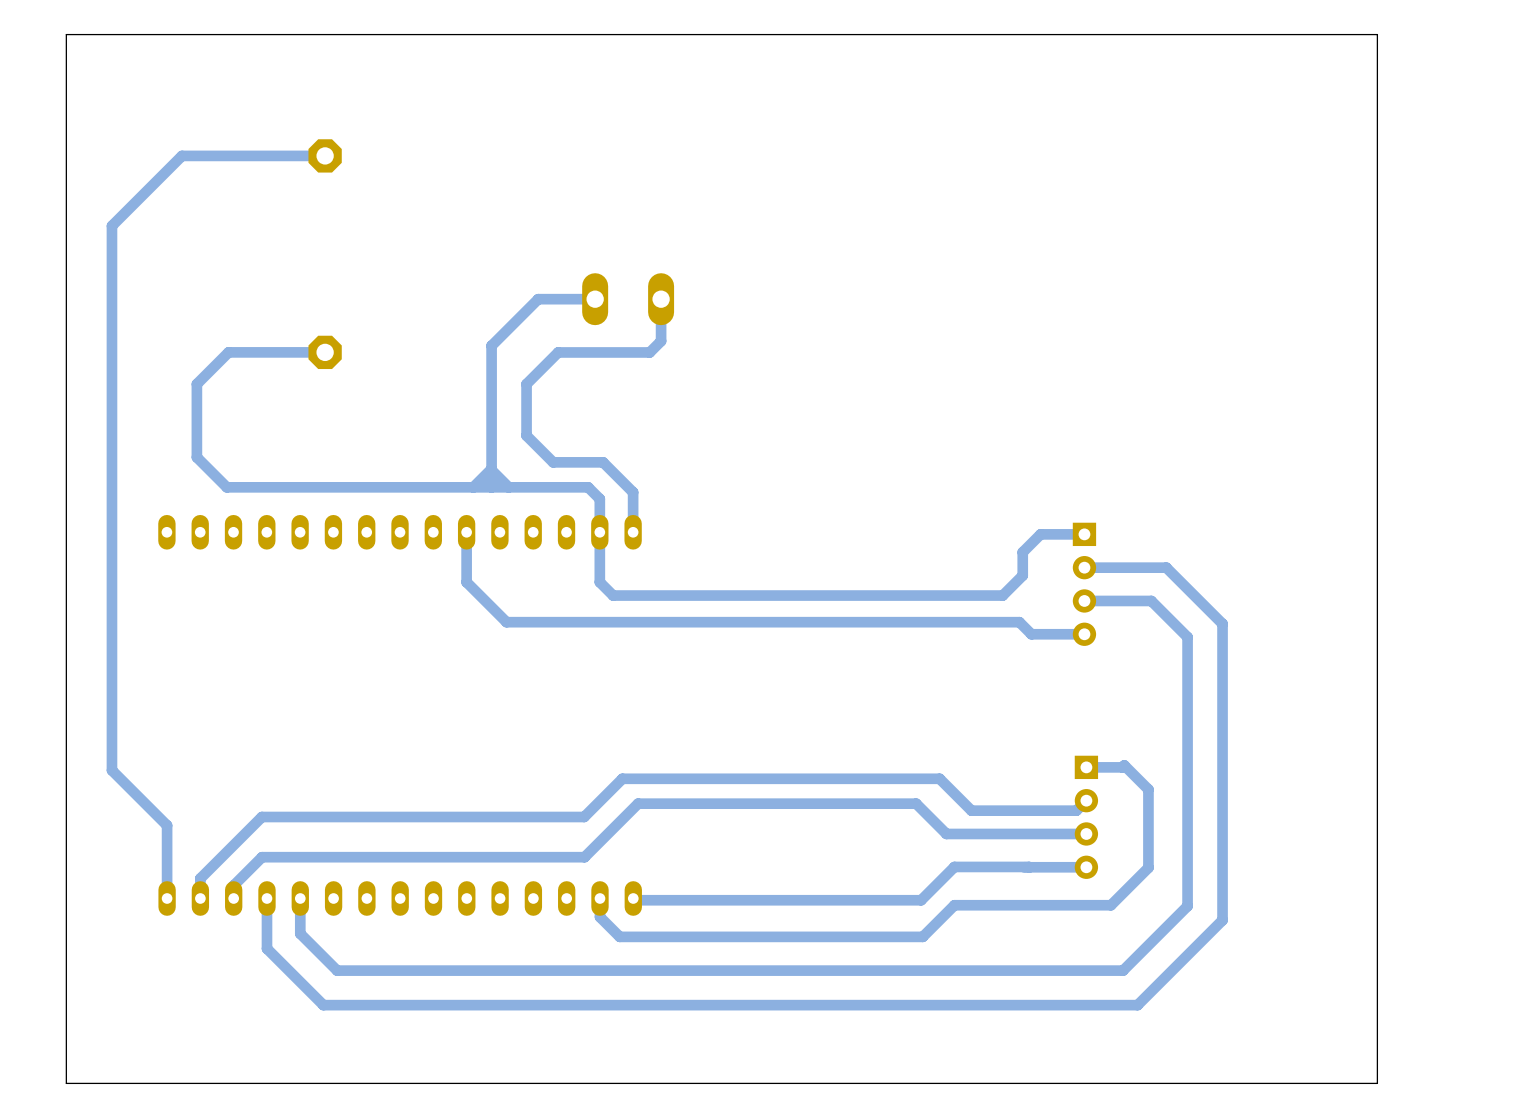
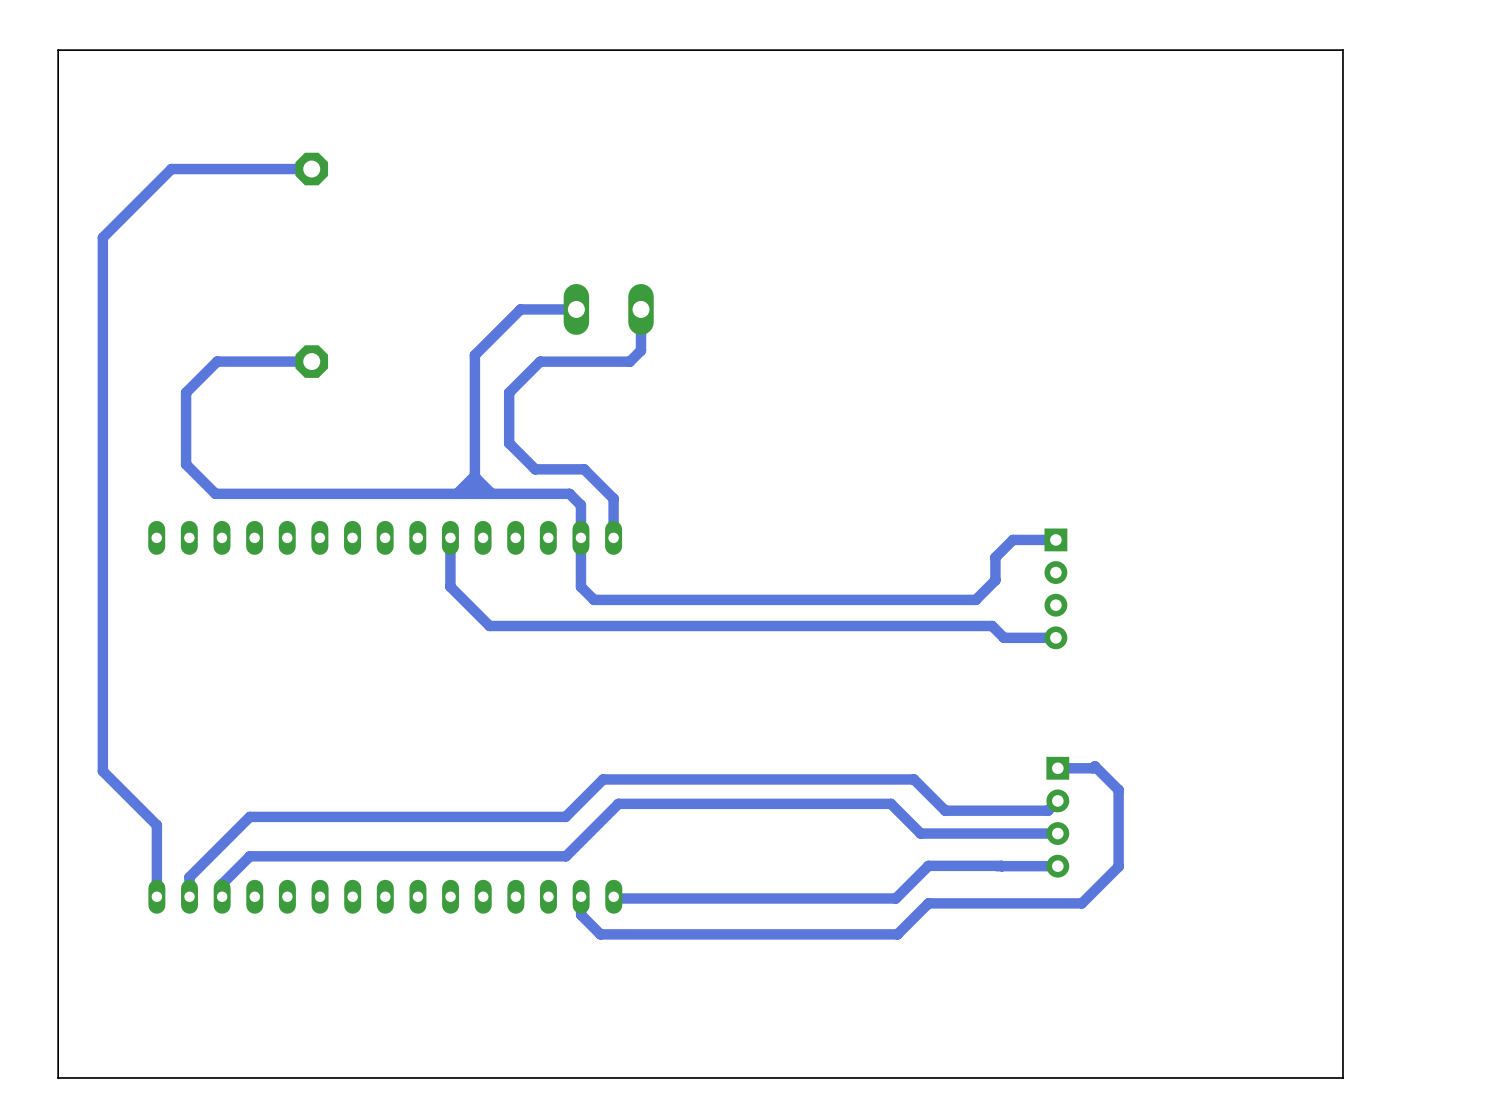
track: (1084, 567) (1166, 567) (1222, 623) (1222, 920) (1137, 1005) (323, 1005) (266, 948) (266, 898) -> none
track: (1084, 600) (1151, 600) (1187, 637) (1187, 906) (1123, 970) (337, 970) (300, 933) (300, 898) -> none

